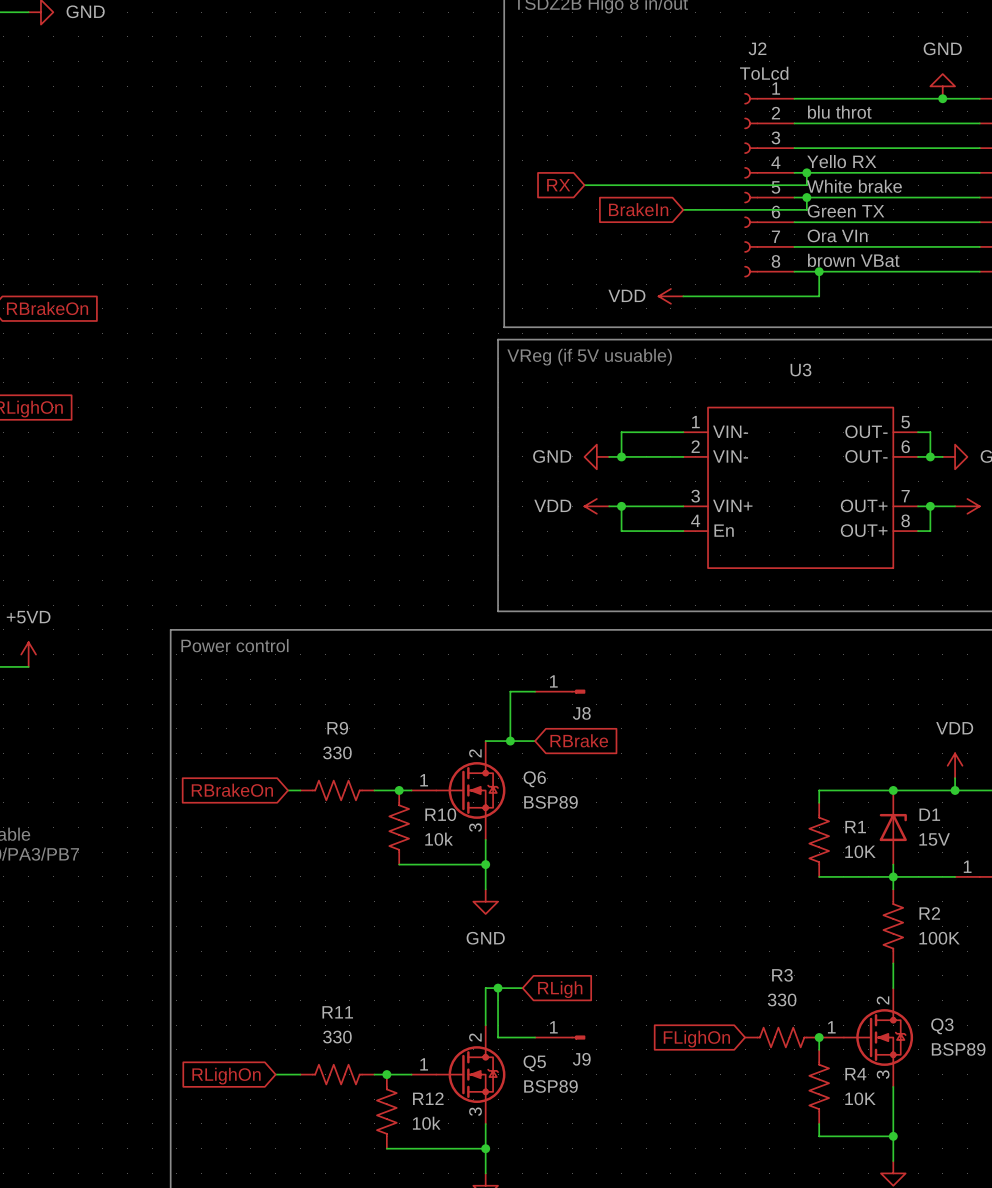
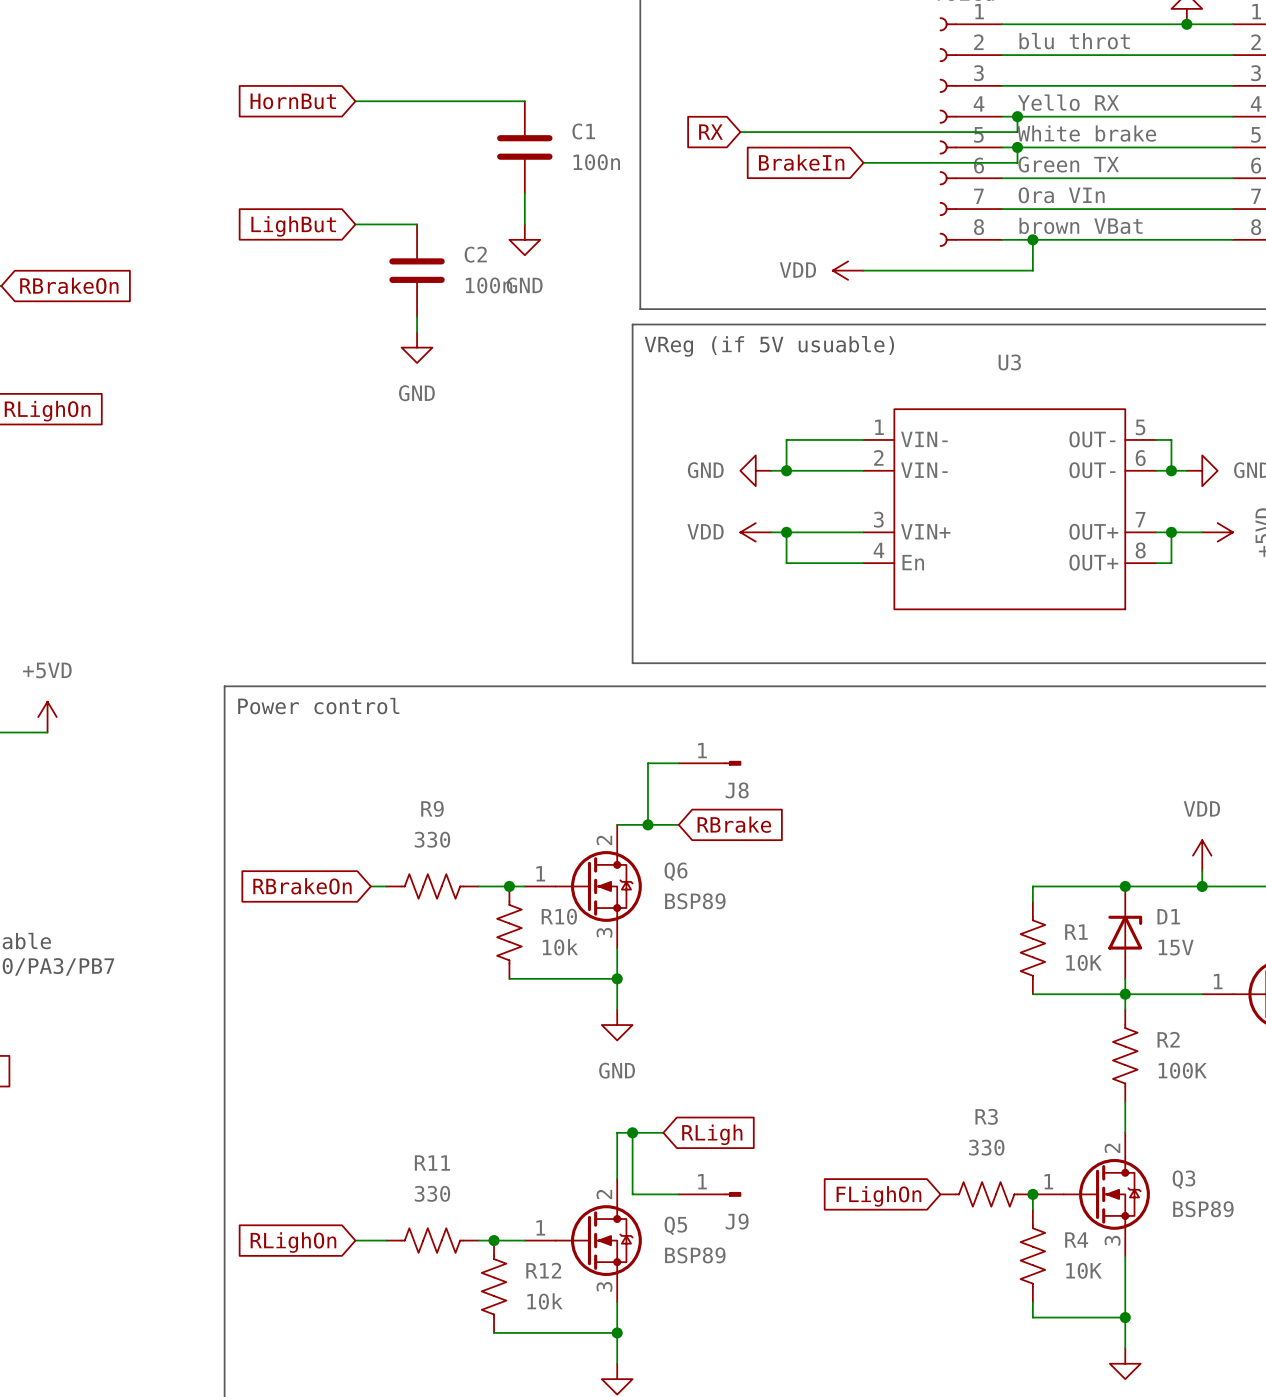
global label: none -> HornBut (293, 101)
wire: none -> (355, 101) (524, 101)
C1: none -> 100n (524, 147)
wire: none -> (524, 193) (524, 224)
wire: none -> (355, 224) (417, 224)
global label: none -> LighBut (293, 226)
power symbol: none -> GND (524, 239)
C2: none -> 100n (417, 270)
wire: none -> (417, 316) (417, 332)
power symbol: none -> GND (417, 347)

